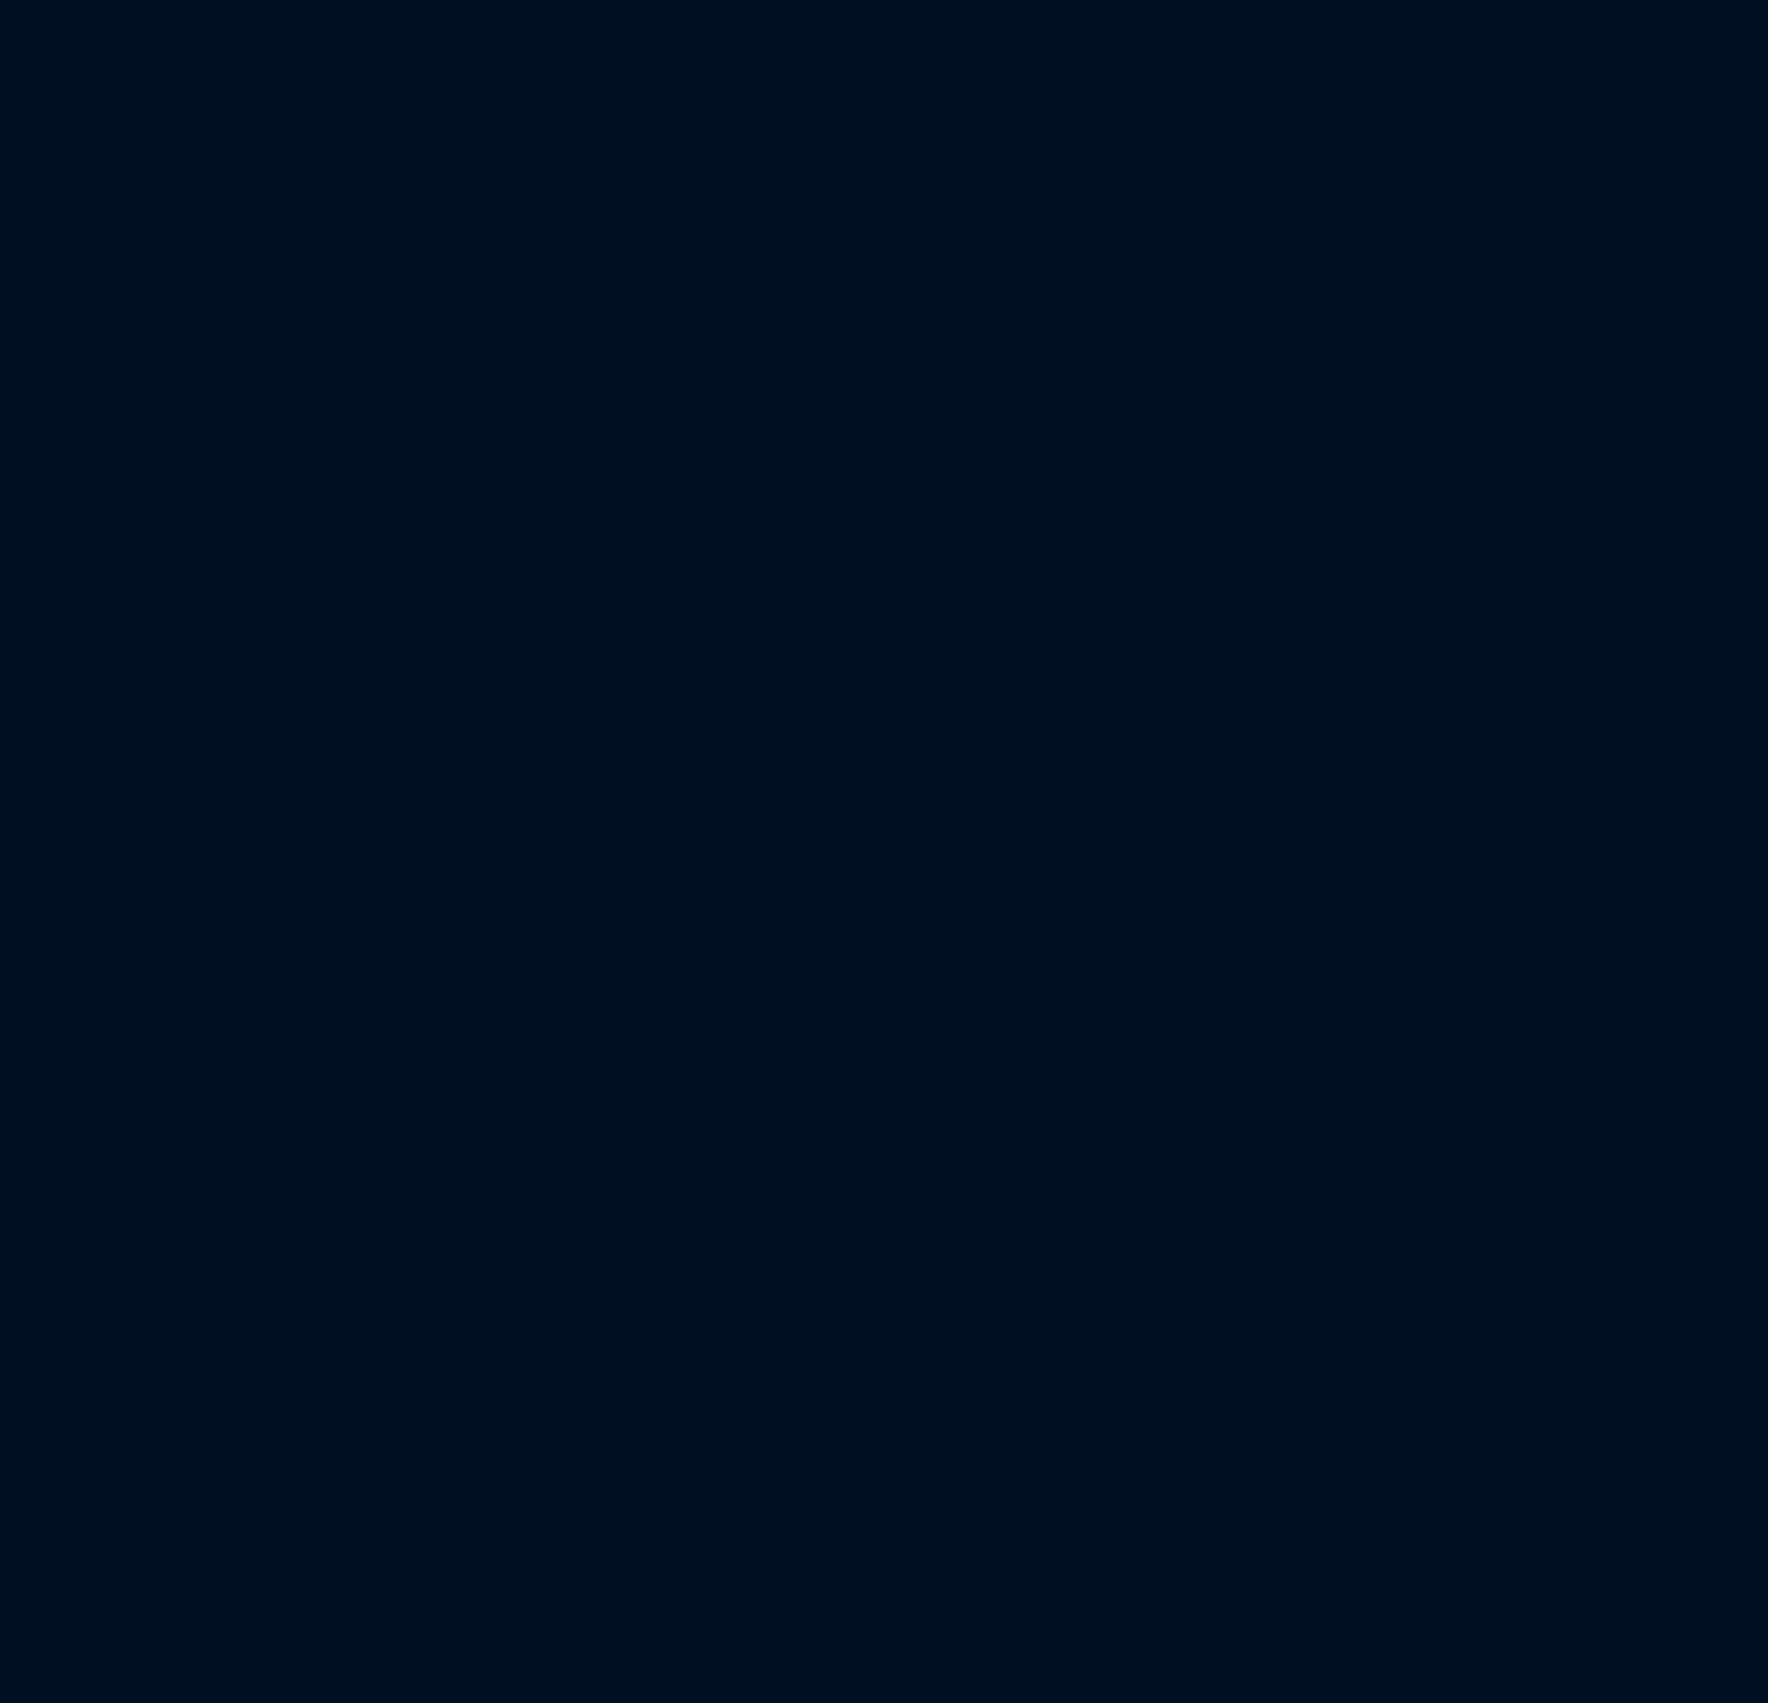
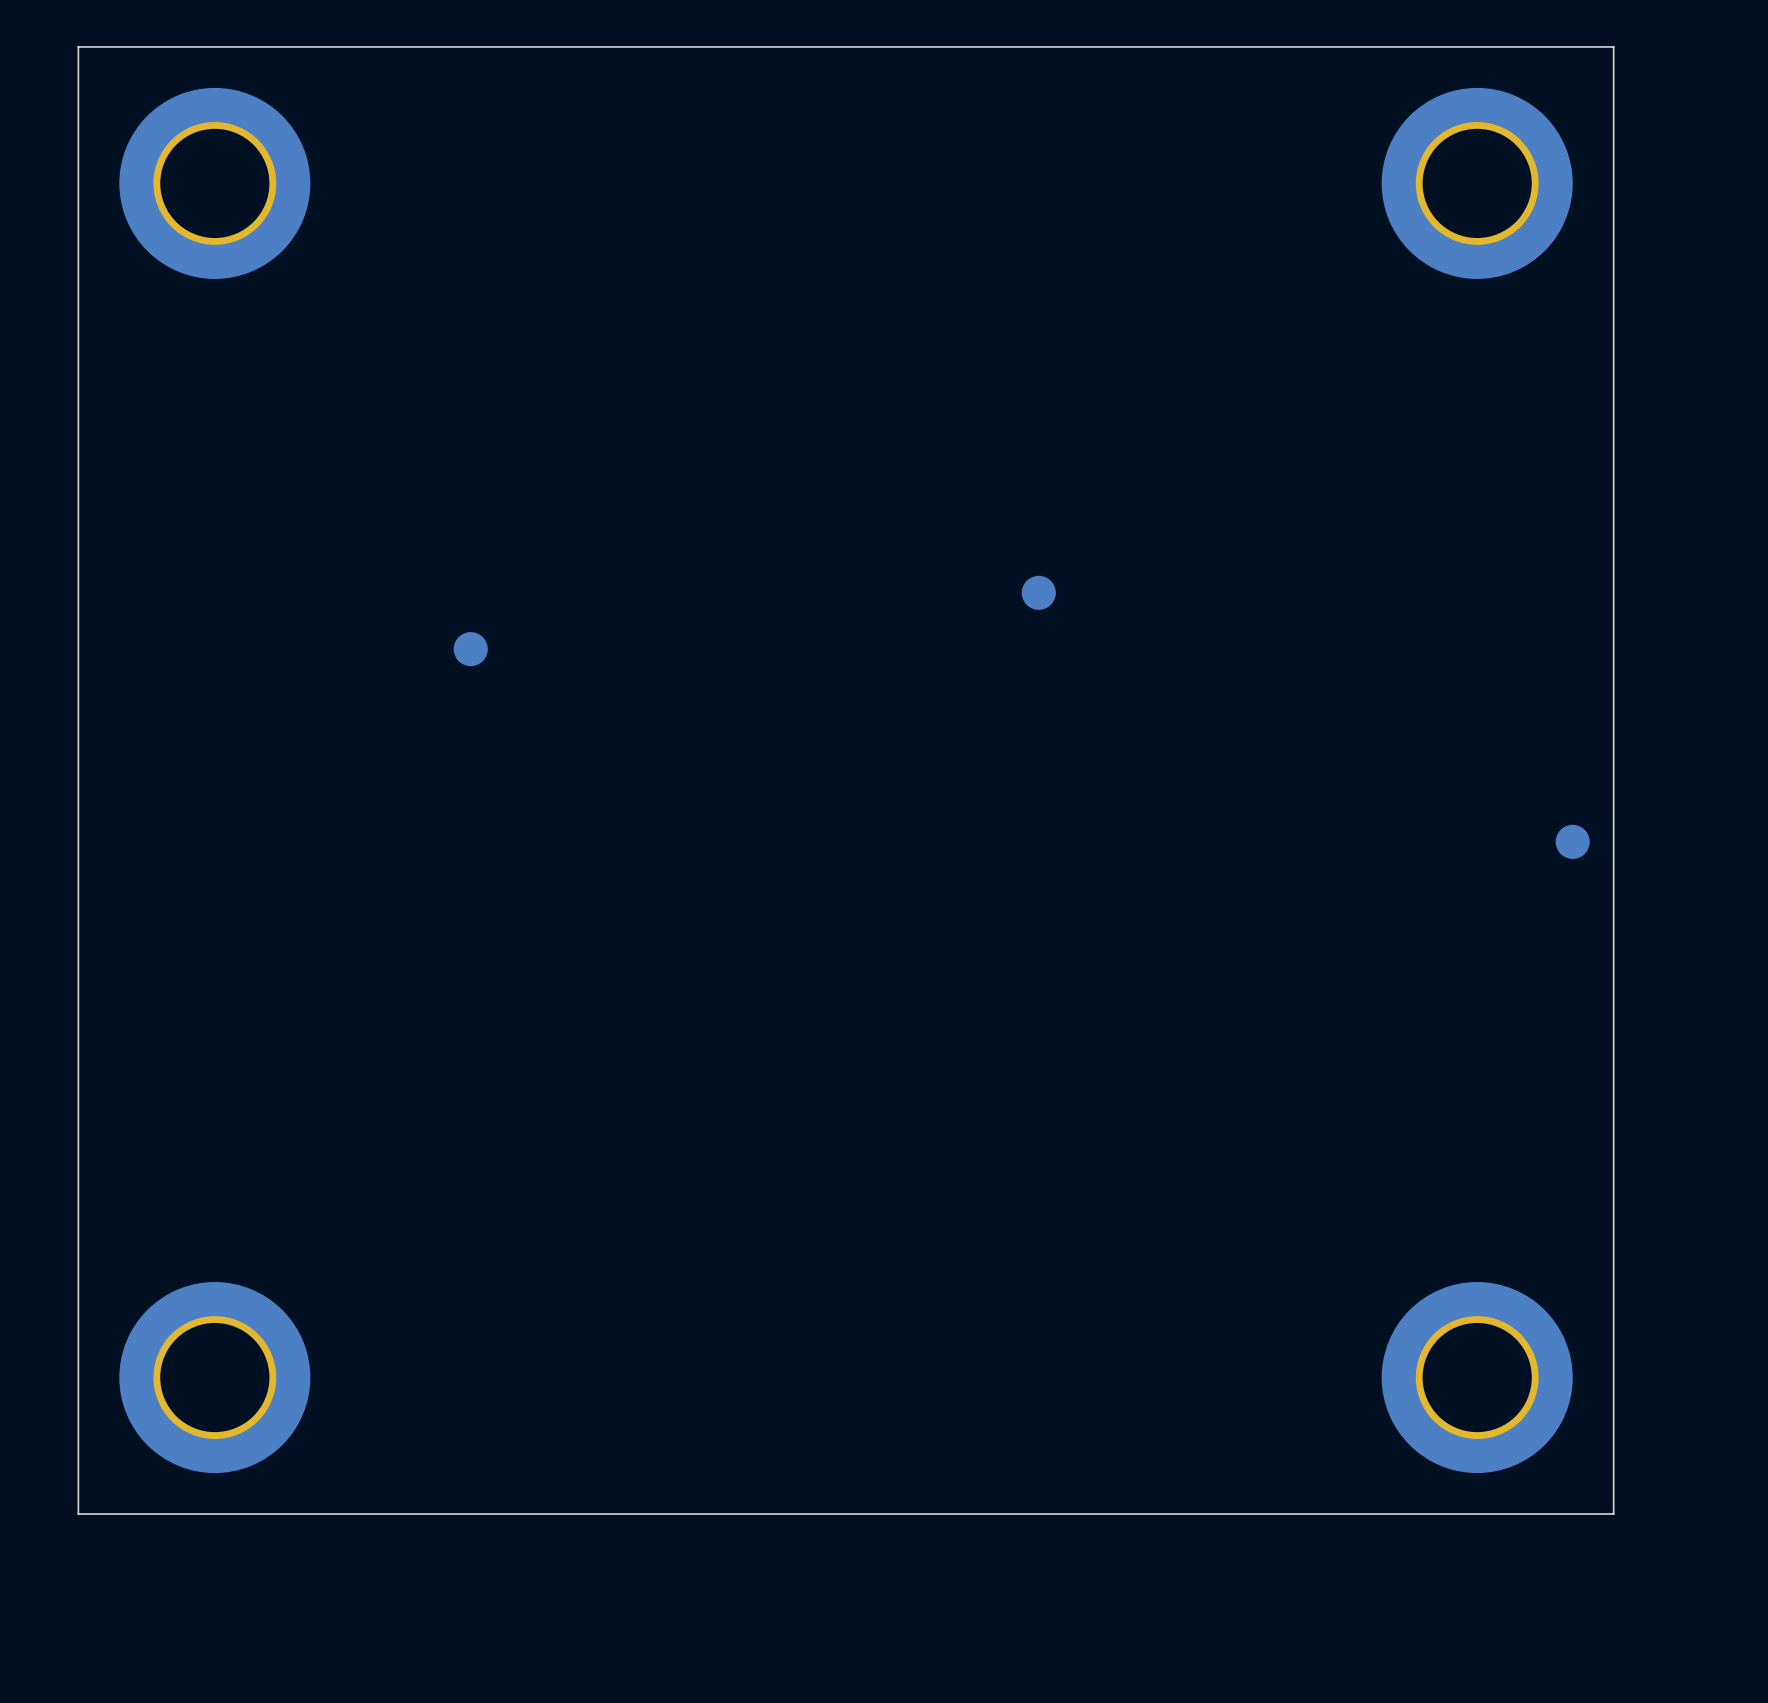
board edge: none -> (78, 46) (1613, 46) (1613, 1514) (78, 1514) (78, 46)
part: none -> (214, 183)
part: none -> (1477, 183)
drawing: none -> [1021, 575, 1056, 610]
drawing: none -> [453, 632, 488, 667]
drawing: none -> [1555, 824, 1590, 859]
part: none -> (214, 1377)
part: none -> (1477, 1377)

